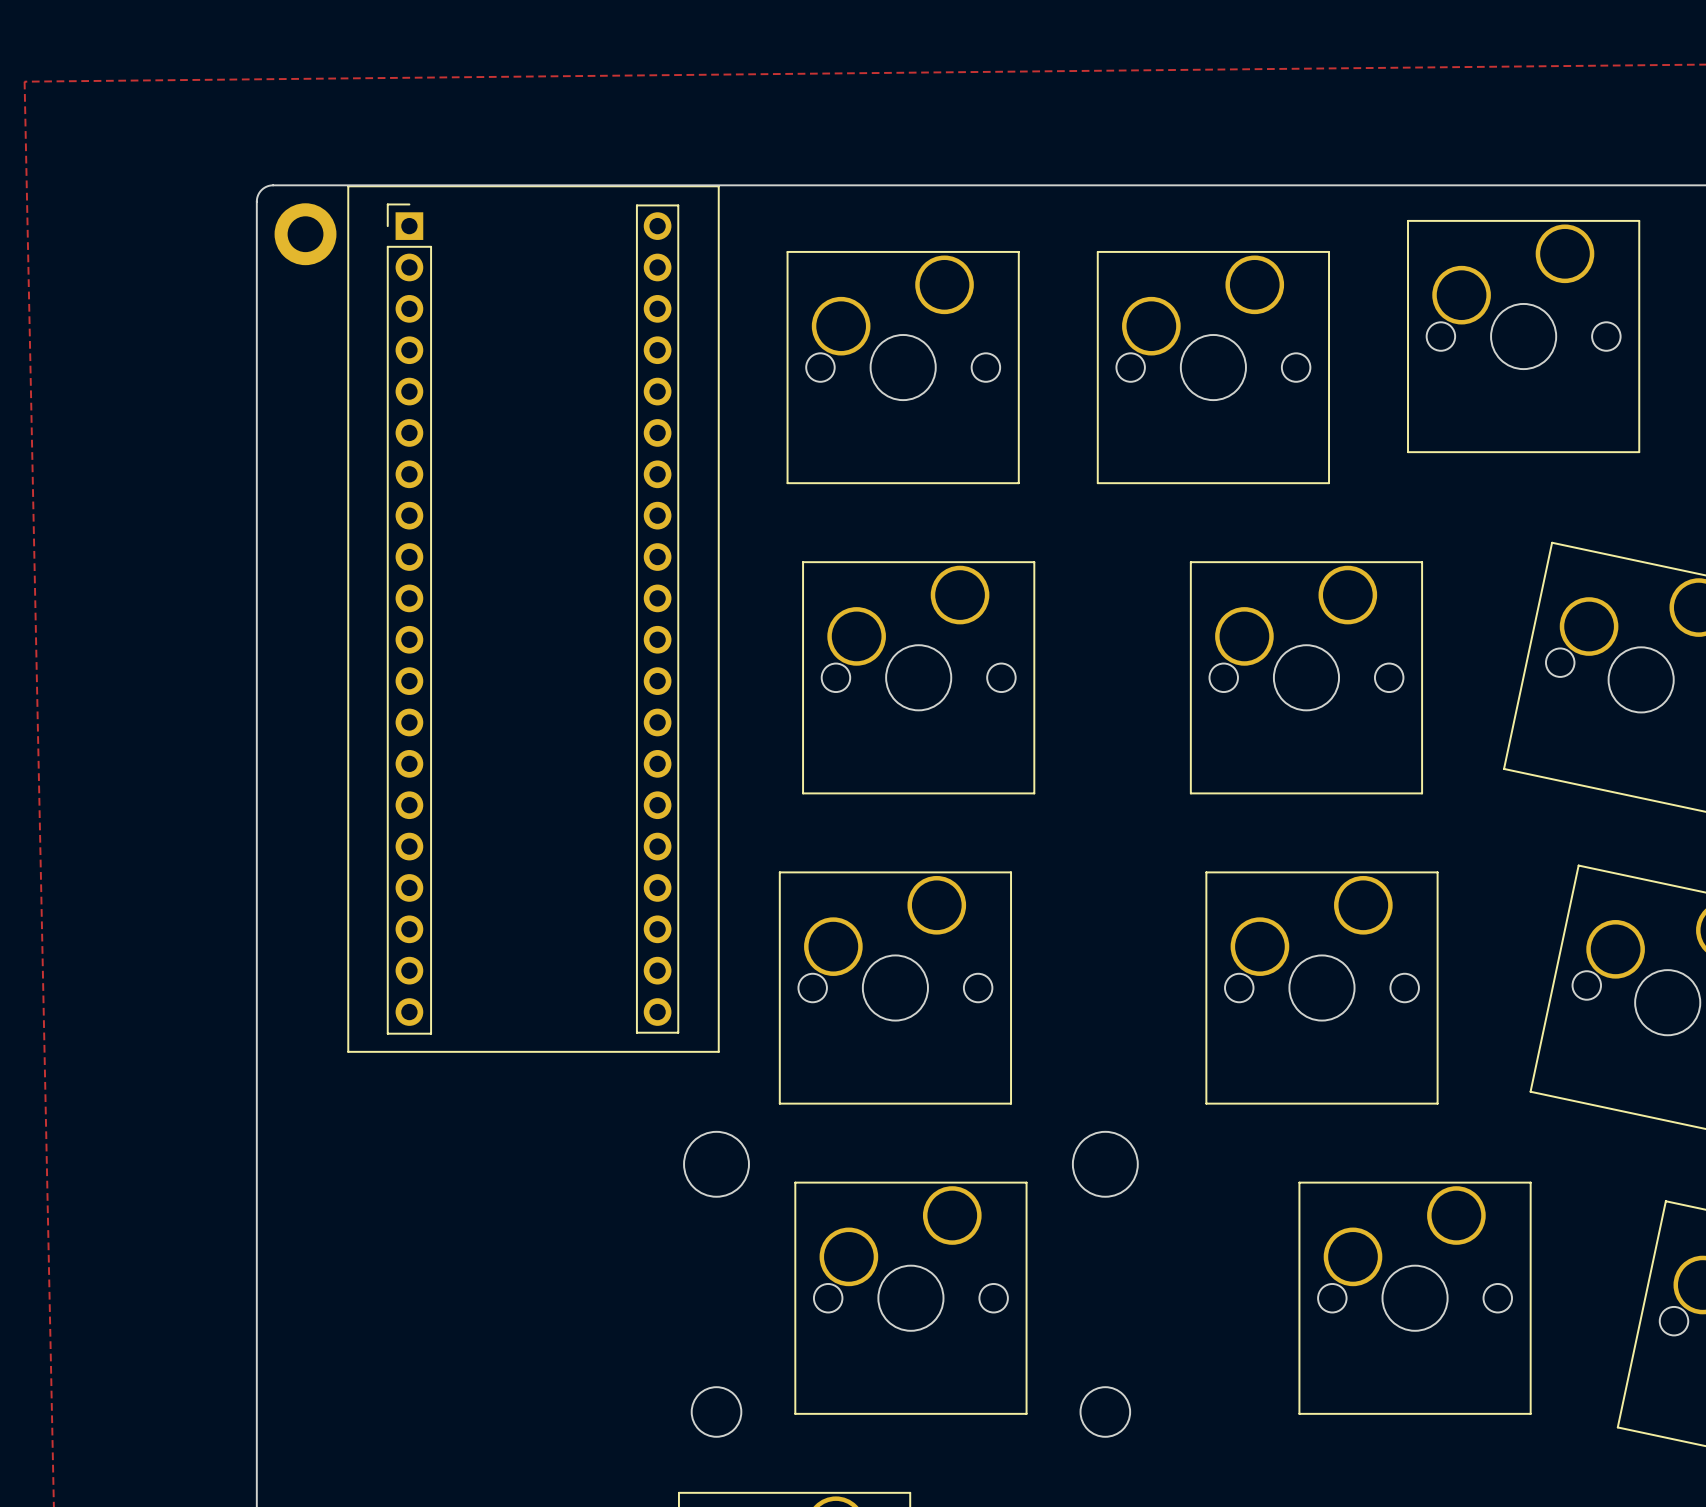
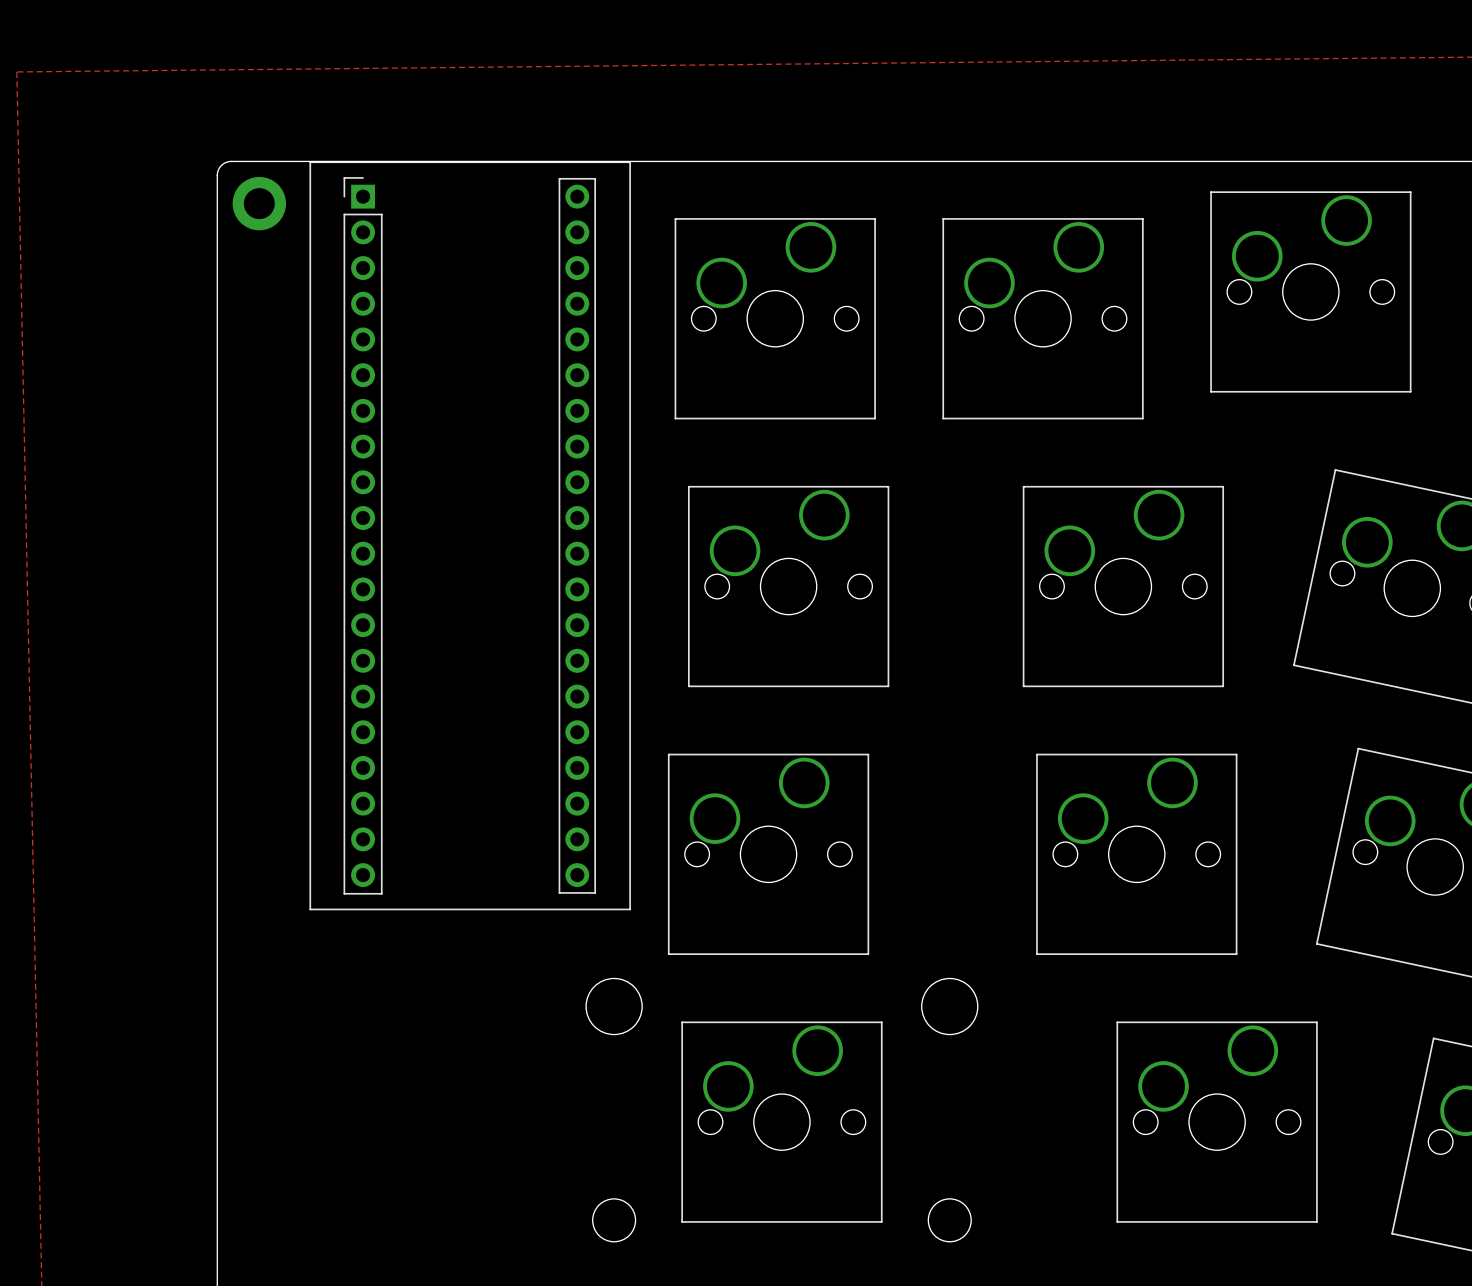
part position: (533, 619) -> (470, 535)

